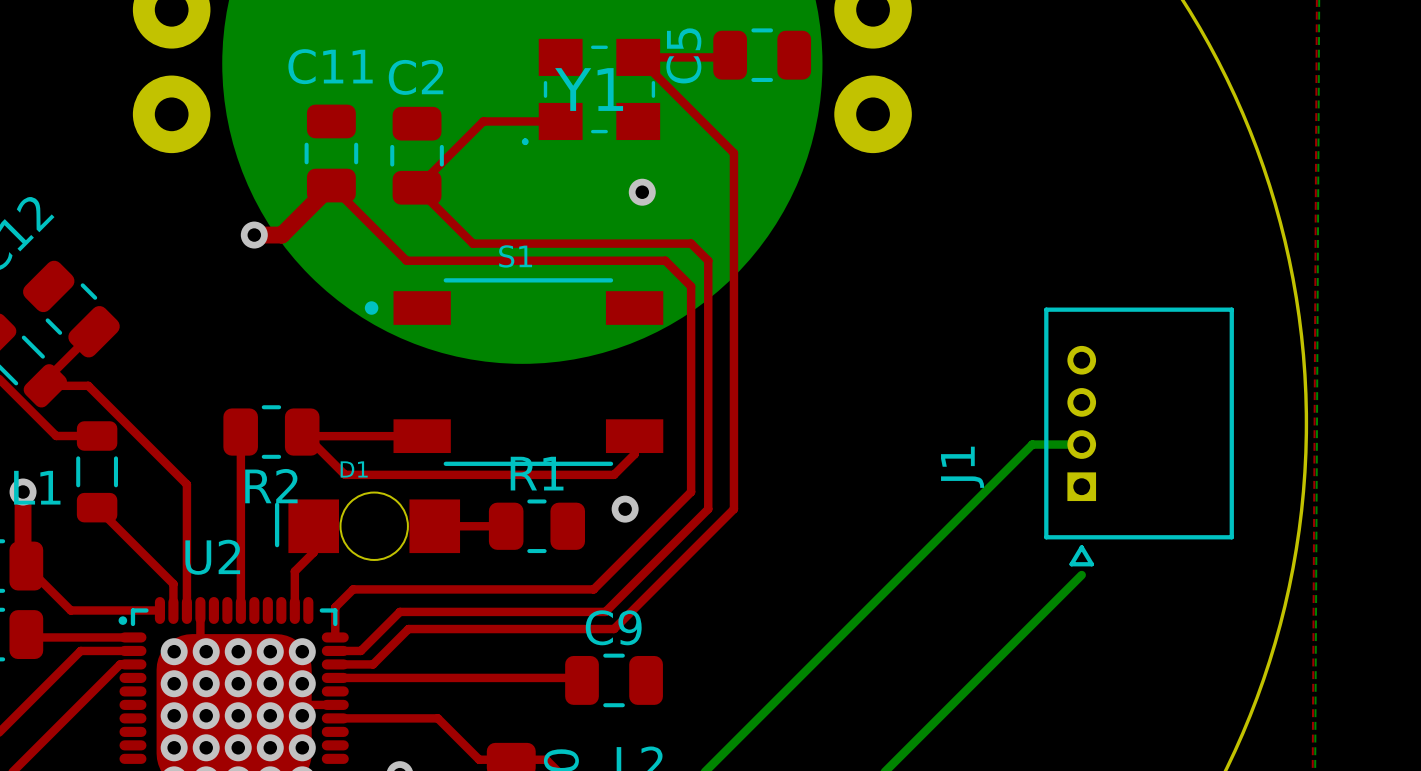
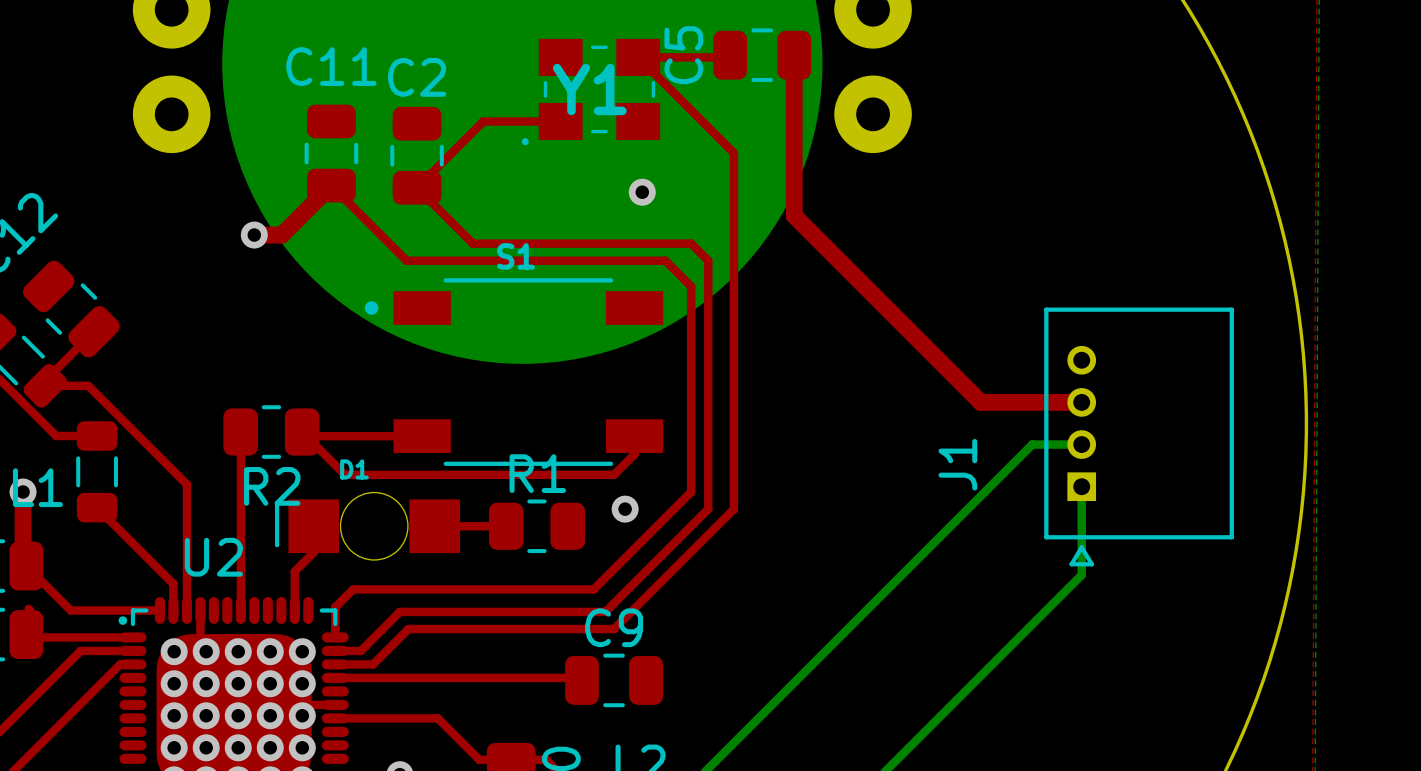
top track: none -> (794, 55) (794, 215) (980, 402) (1081, 402)
bottom track: none -> (1081, 486) (1081, 575)
top track: none -> (28, 608) (30, 610)

